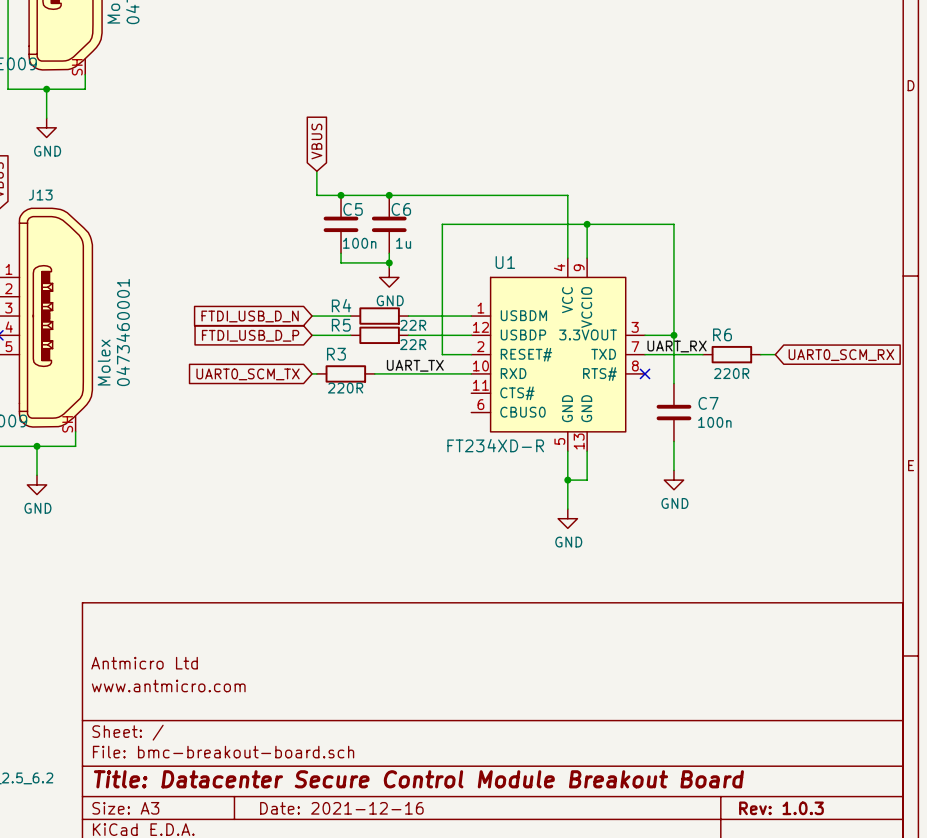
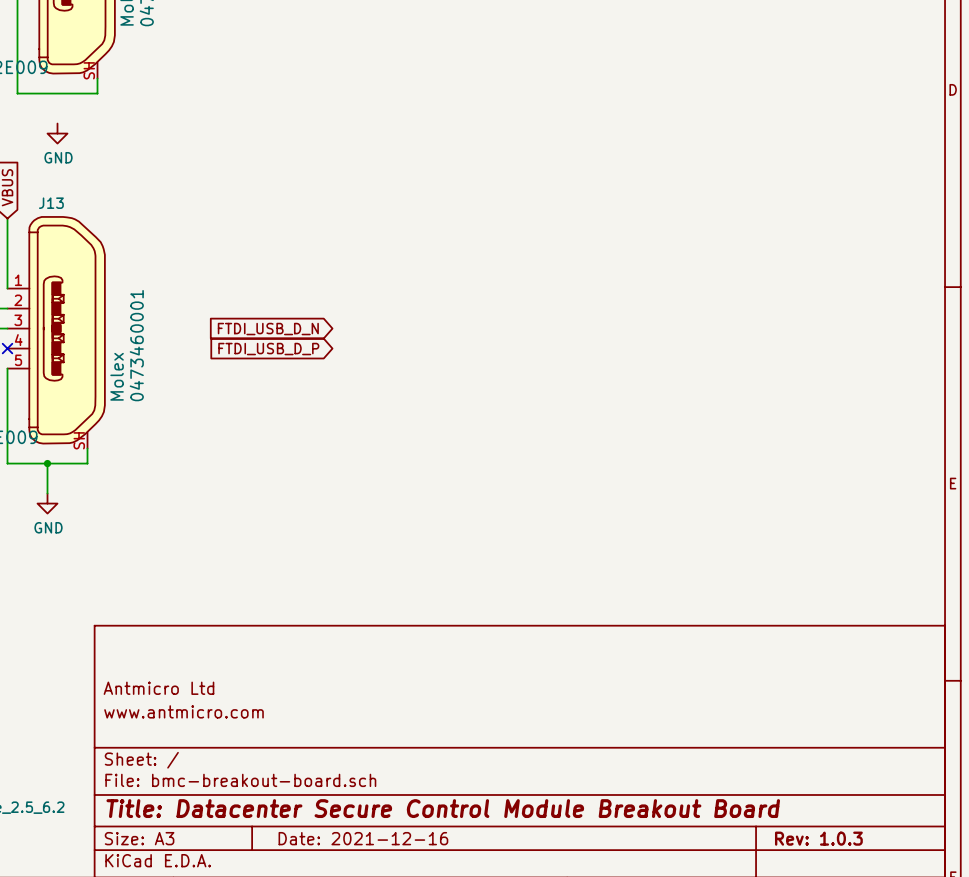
wire: (46, 89) (46, 118) -> none
junction: (46, 89) -> none
global label: VBUS (316, 141) -> none
wire: (316, 171) (316, 195) (567, 195) (567, 258) -> none
junction: (341, 195) -> none
junction: (389, 195) -> none
C5: (341, 224) -> none
C6: (389, 224) -> none
wire: (587, 224) (587, 258) -> none
junction: (587, 224) -> none
wire: (341, 253) (341, 262) (389, 262) -> none
wire: (389, 253) (389, 267) -> none
junction: (389, 262) -> none
power symbol: GND (389, 277) -> none
wire: (312, 316) (350, 316) -> none
R4: (379, 316) -> none
wire: (408, 316) (471, 316) -> none
wire: (312, 335) (350, 335) -> none
R5: (379, 335) -> none
wire: (408, 335) (471, 335) -> none
wire: (645, 335) (673, 335) -> none
junction: (673, 335) -> none
label: UART_RX (677, 346) -> none
wire: (471, 354) (442, 354) (442, 224) (673, 224) (673, 383) -> none
U1: FT234XD-R (558, 354) -> none
wire: (645, 354) (702, 354) -> none
R6: (731, 354) -> none
wire: (760, 354) (775, 354) -> none
global label: UART0_SCM_RX (841, 355) -> none
label: UART_TX (415, 365) -> none
wire: (312, 373) (316, 373) -> none
R3: (345, 373) -> none
wire: (374, 373) (471, 373) -> none
no-connect mark: (645, 373) -> none
global label: UART0_SCM_TX (248, 374) -> none
C7: (673, 412) -> none
wire: (673, 441) (673, 470) -> none
wire: (567, 451) (567, 509) -> none
wire: (587, 451) (587, 480) (567, 480) -> none
junction: (567, 480) -> none
power symbol: GND (673, 480) -> none
power symbol: GND (567, 518) -> none

